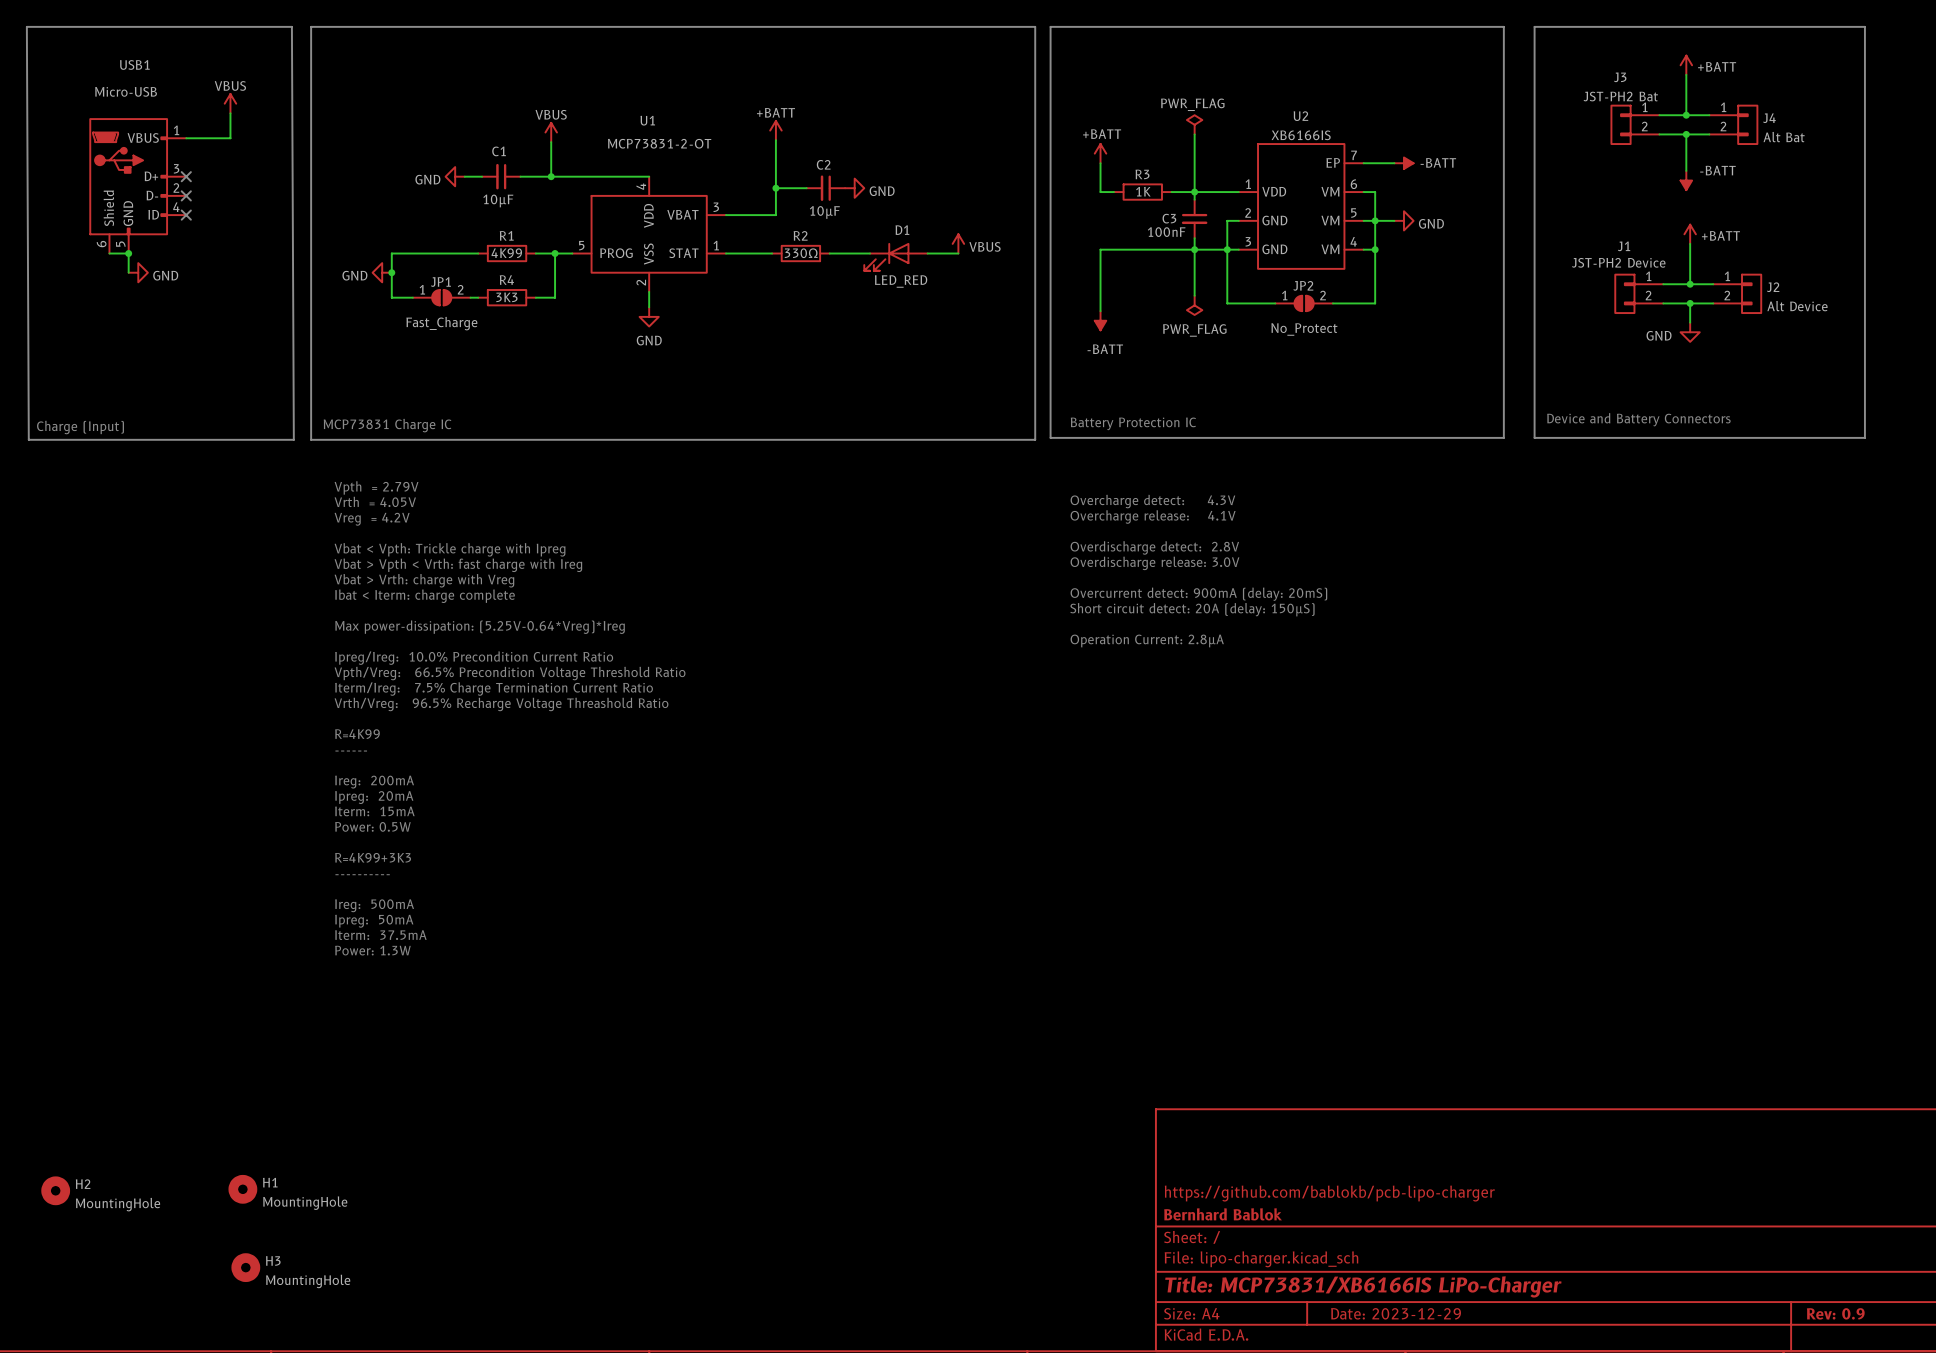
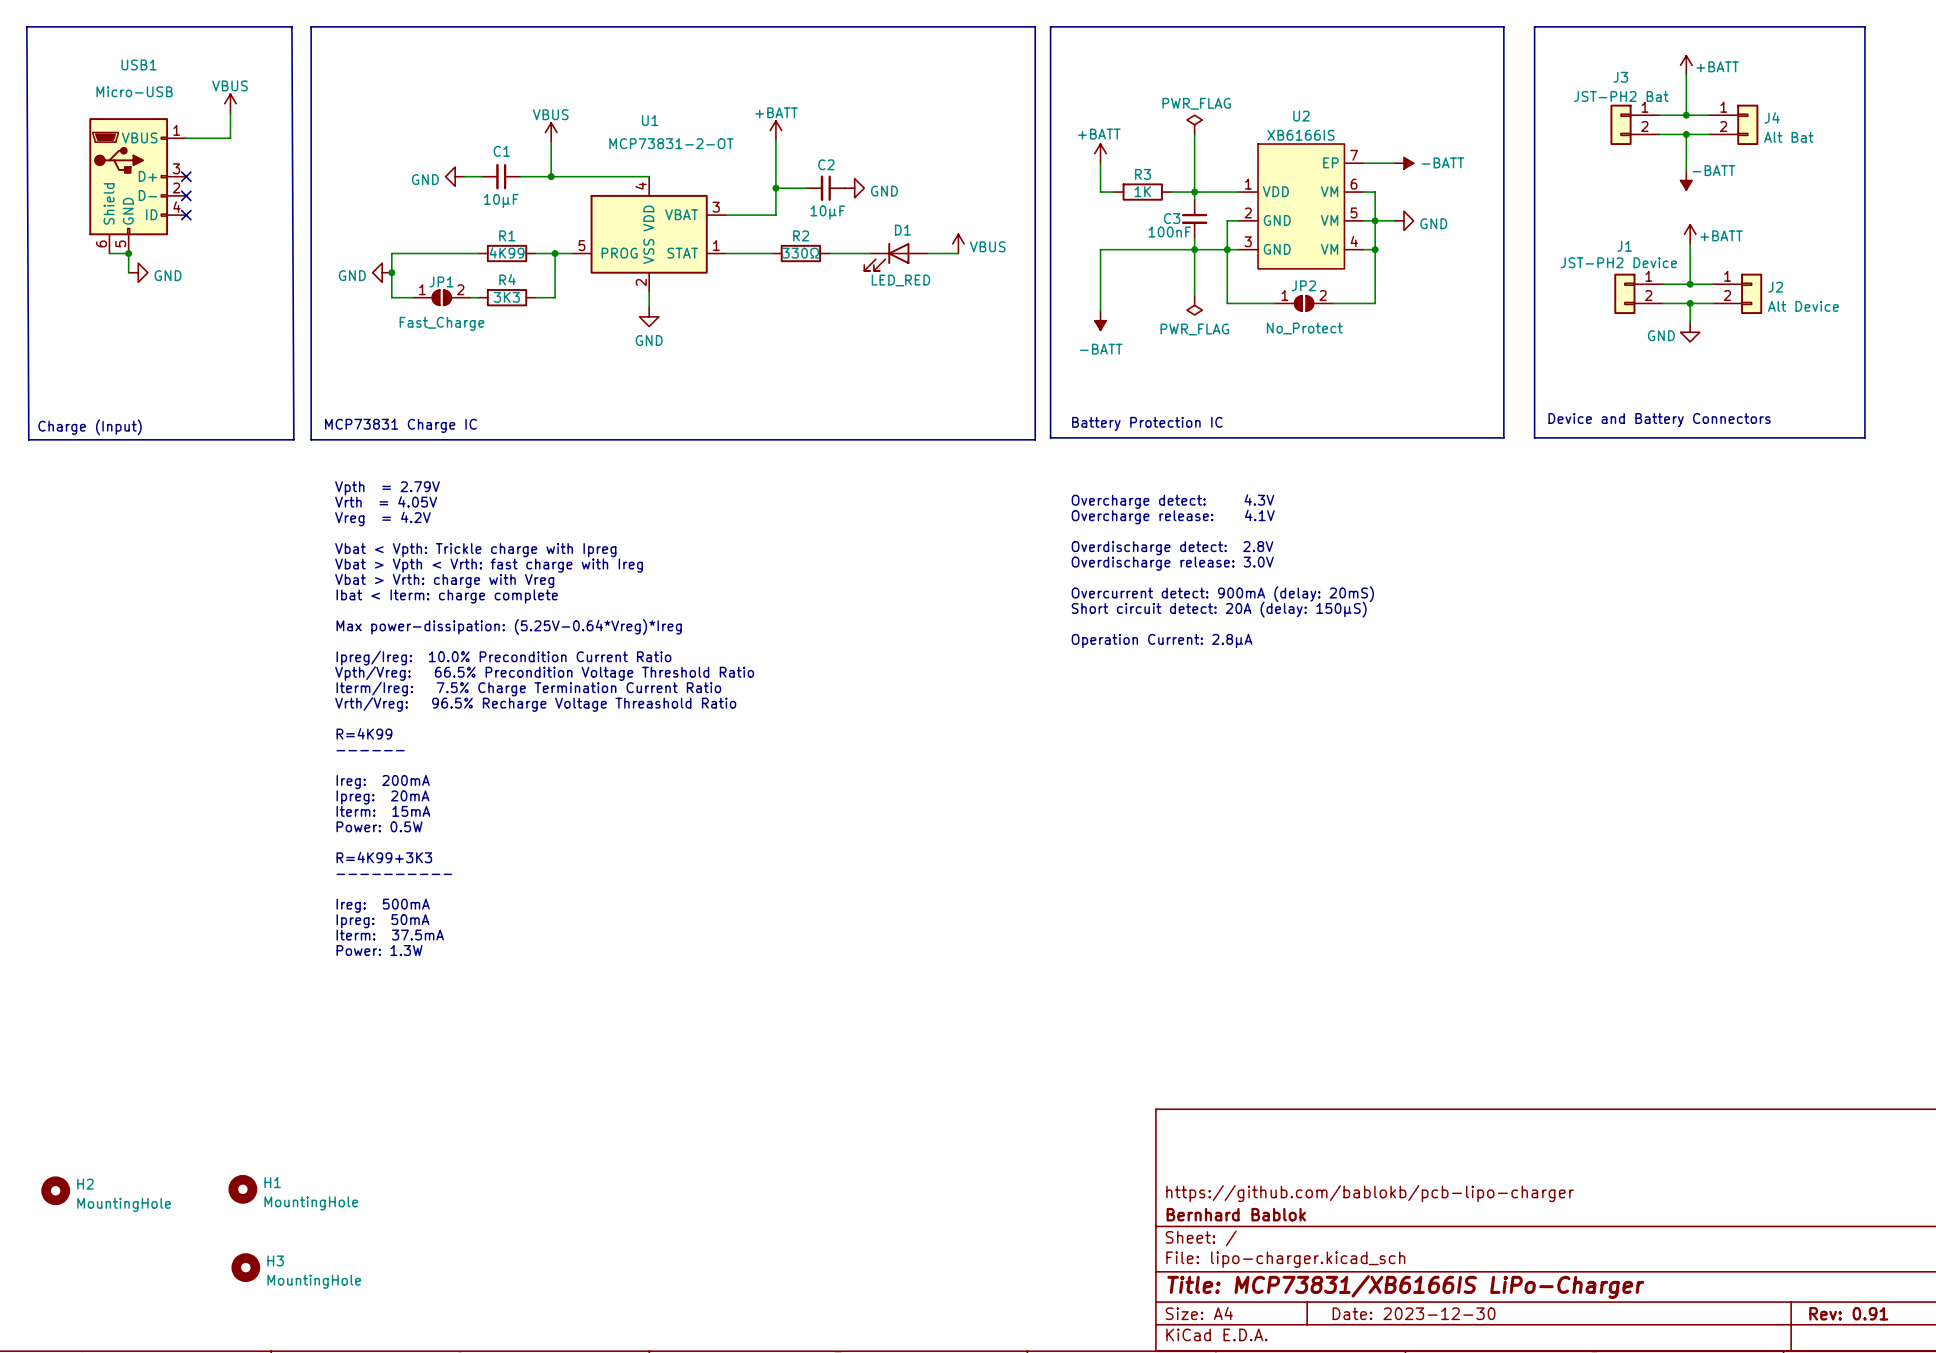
title block: Date: 2023-12-29 (1396, 1313) -> Date: 2023-12-30 (1414, 1313)
title block: Rev: 0.9 (1835, 1313) -> Rev: 0.91 (1848, 1313)

